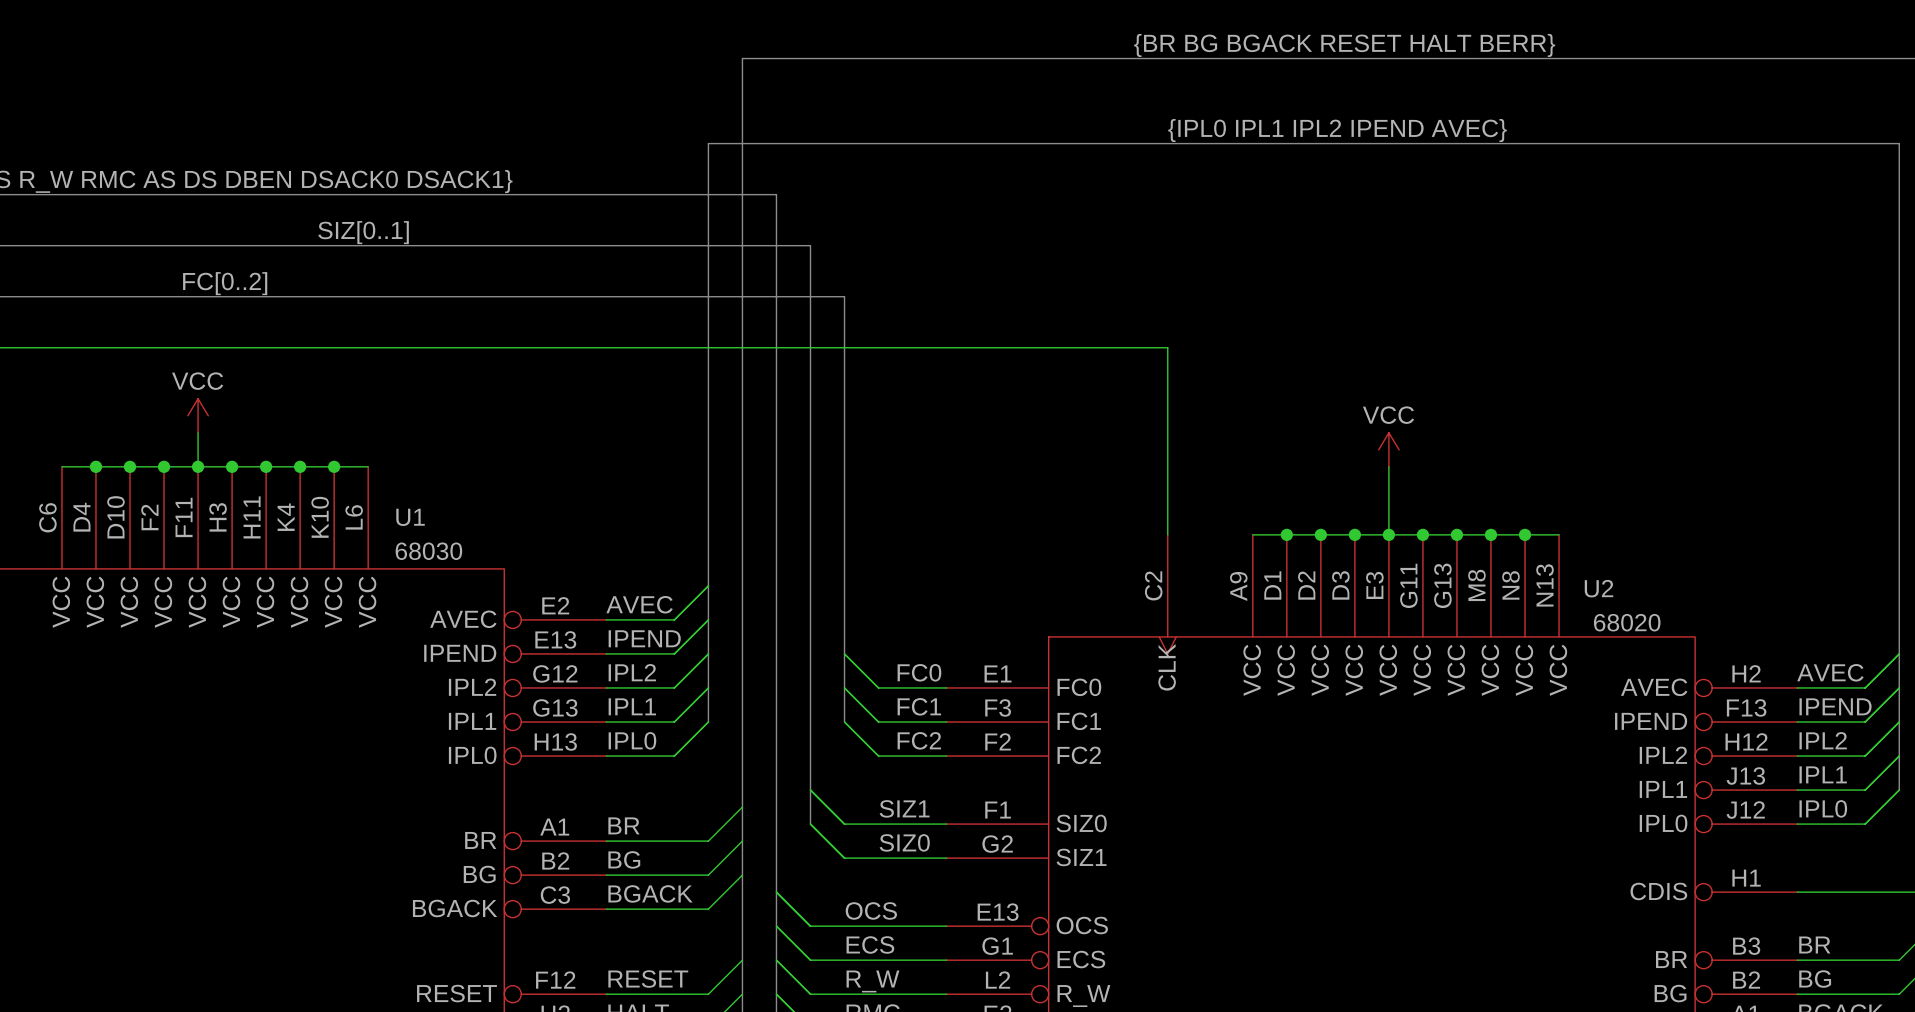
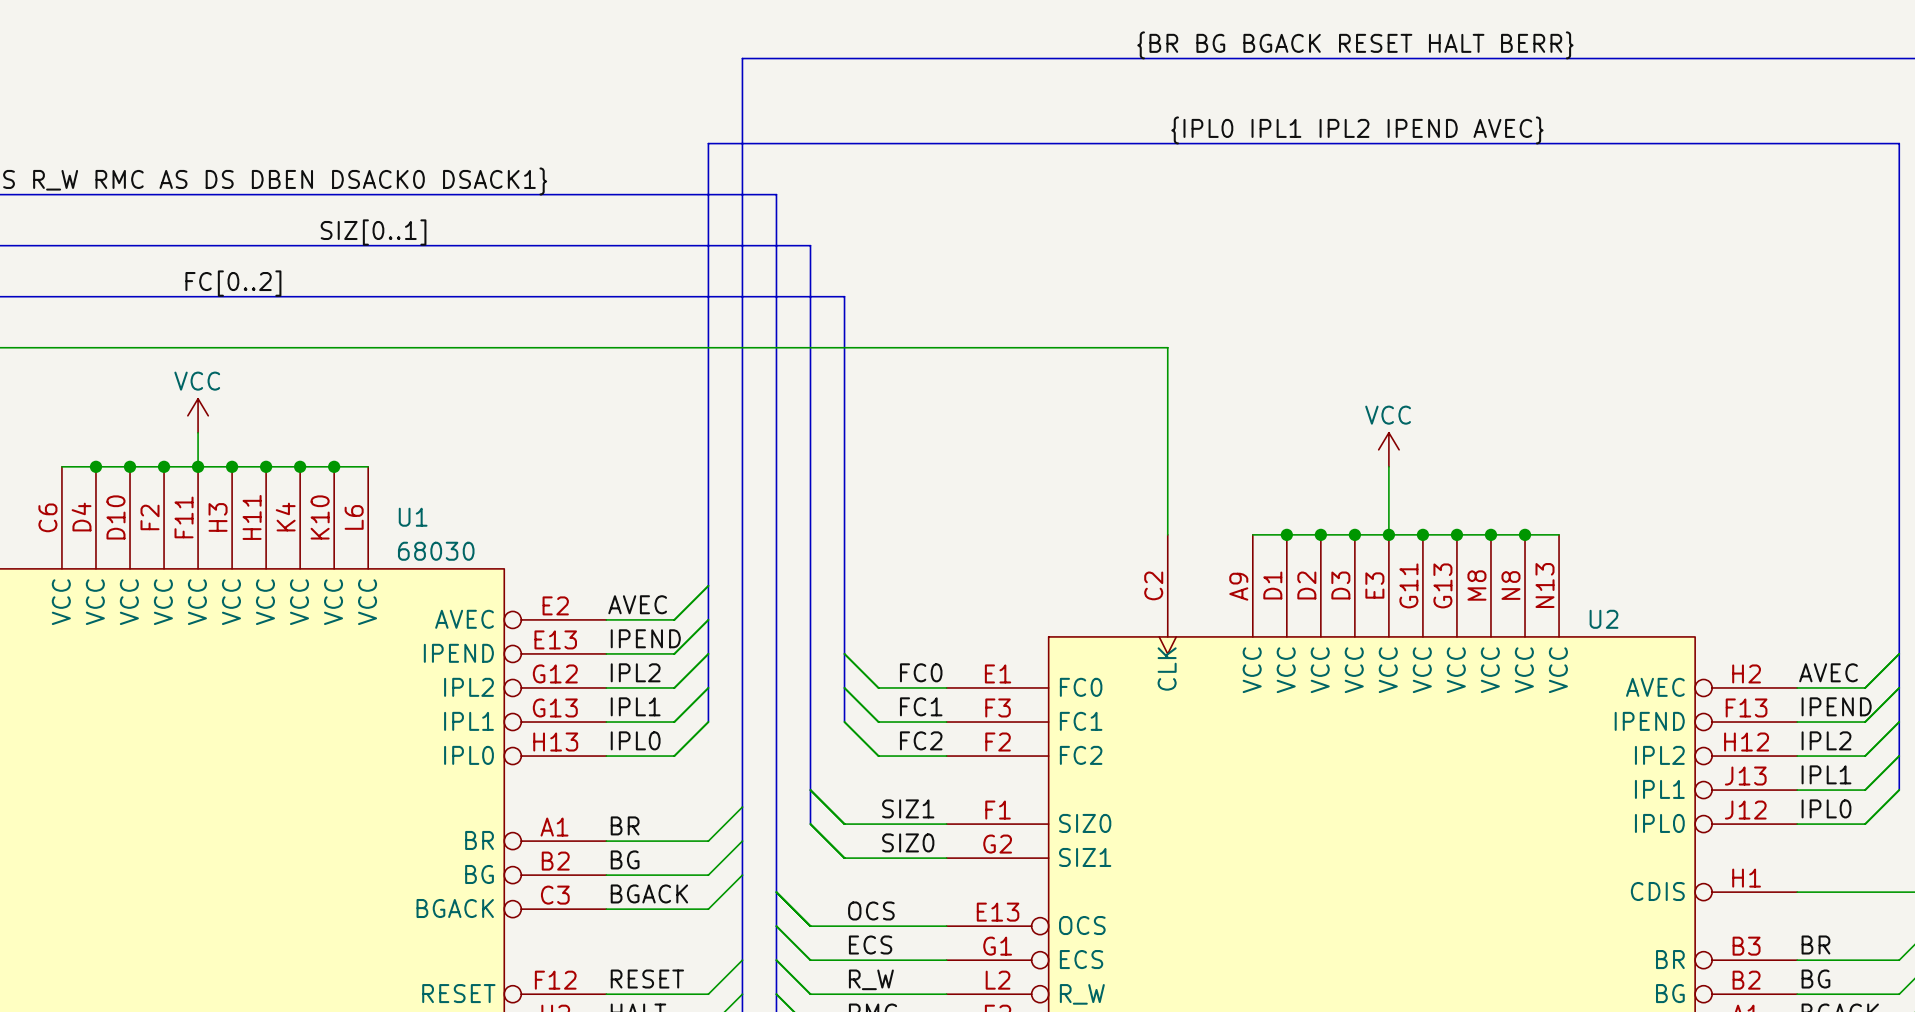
U2 name position: U2 (1598, 588) -> U2 (1603, 619)
U2 value: 68020 (1627, 622) -> none

